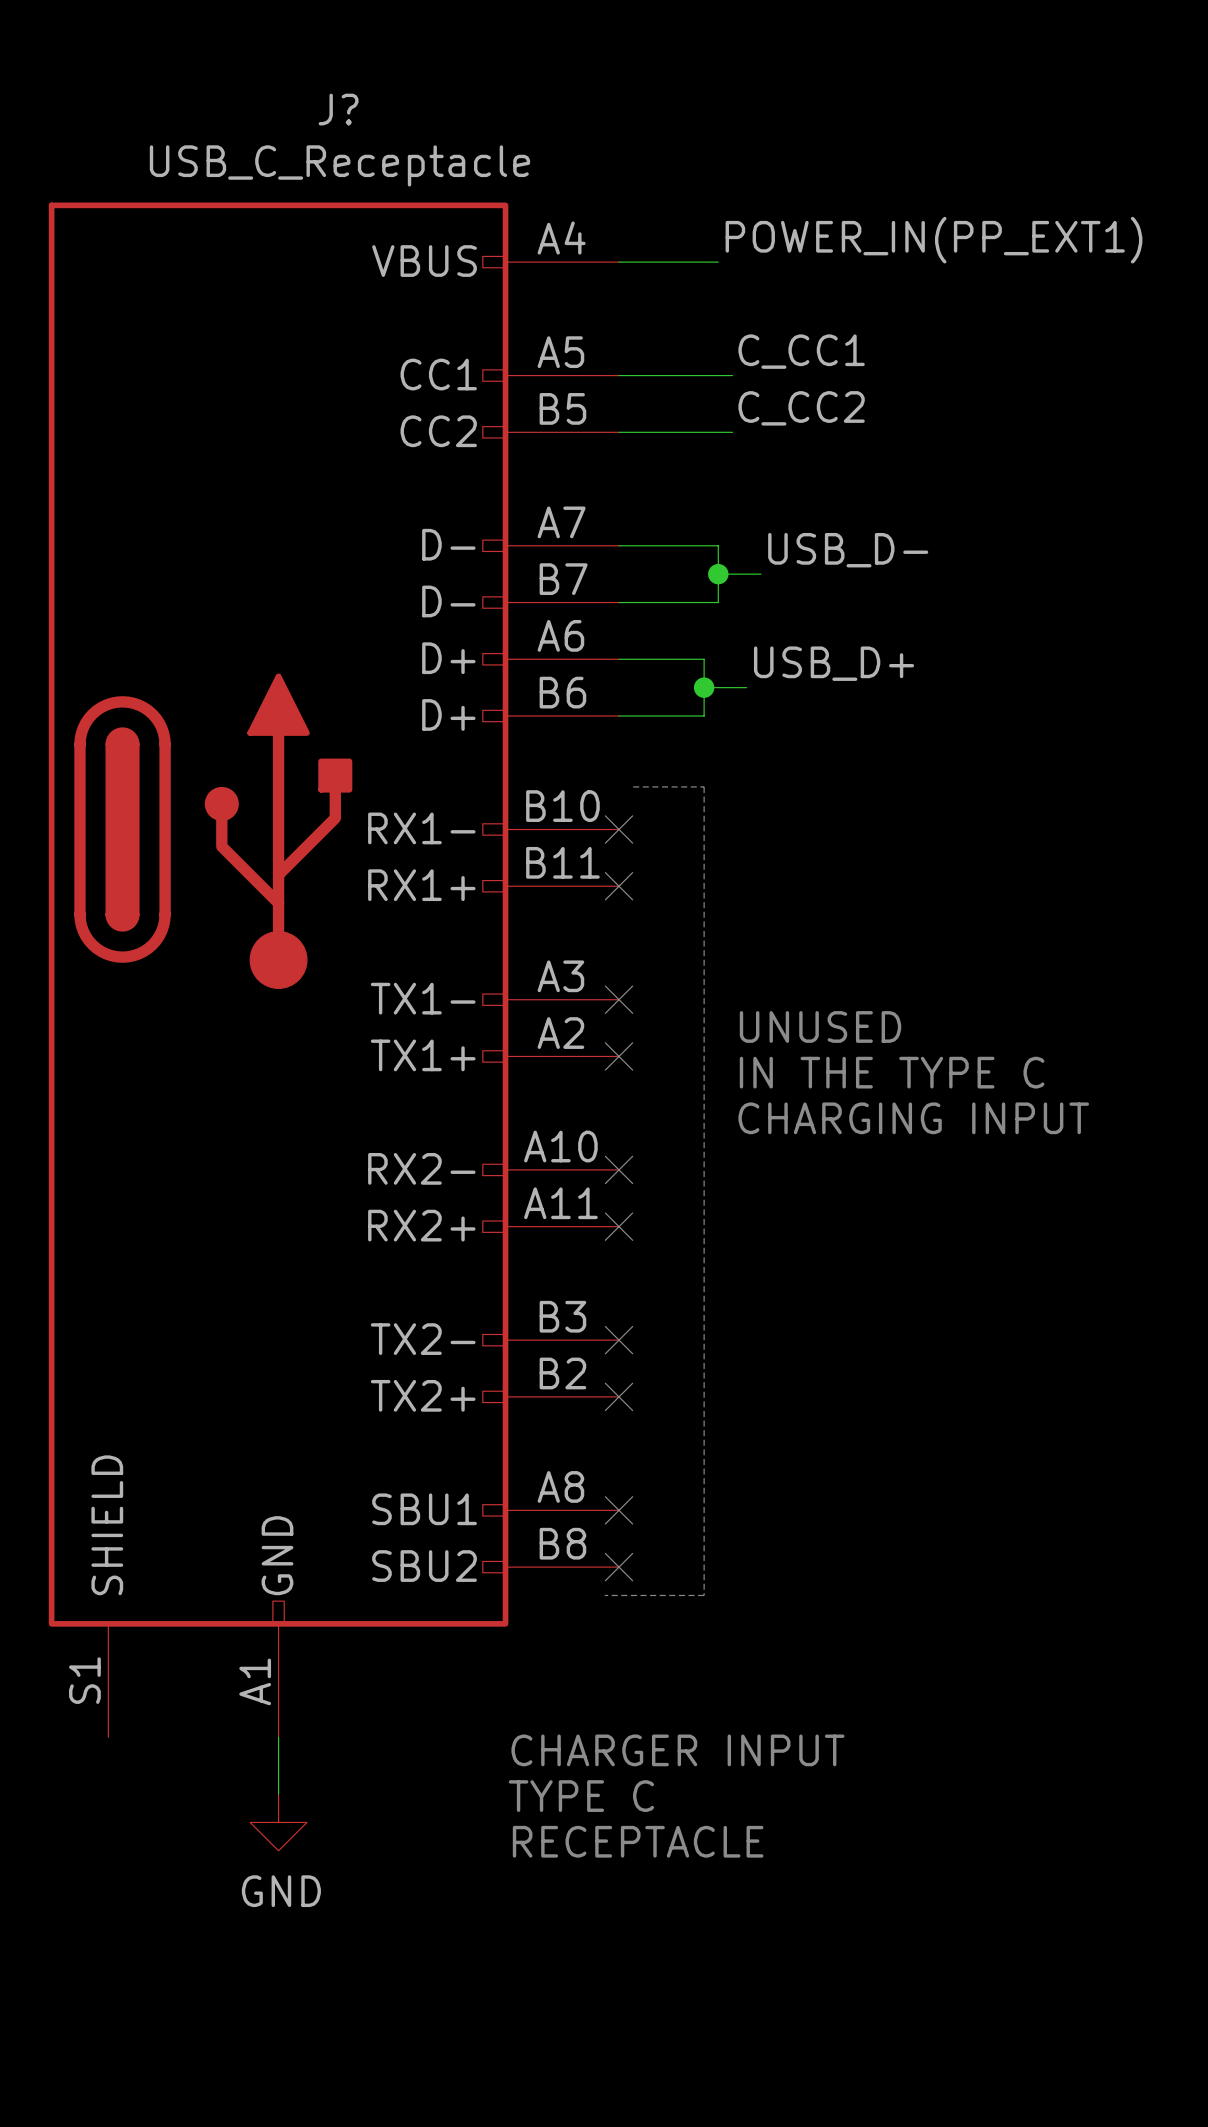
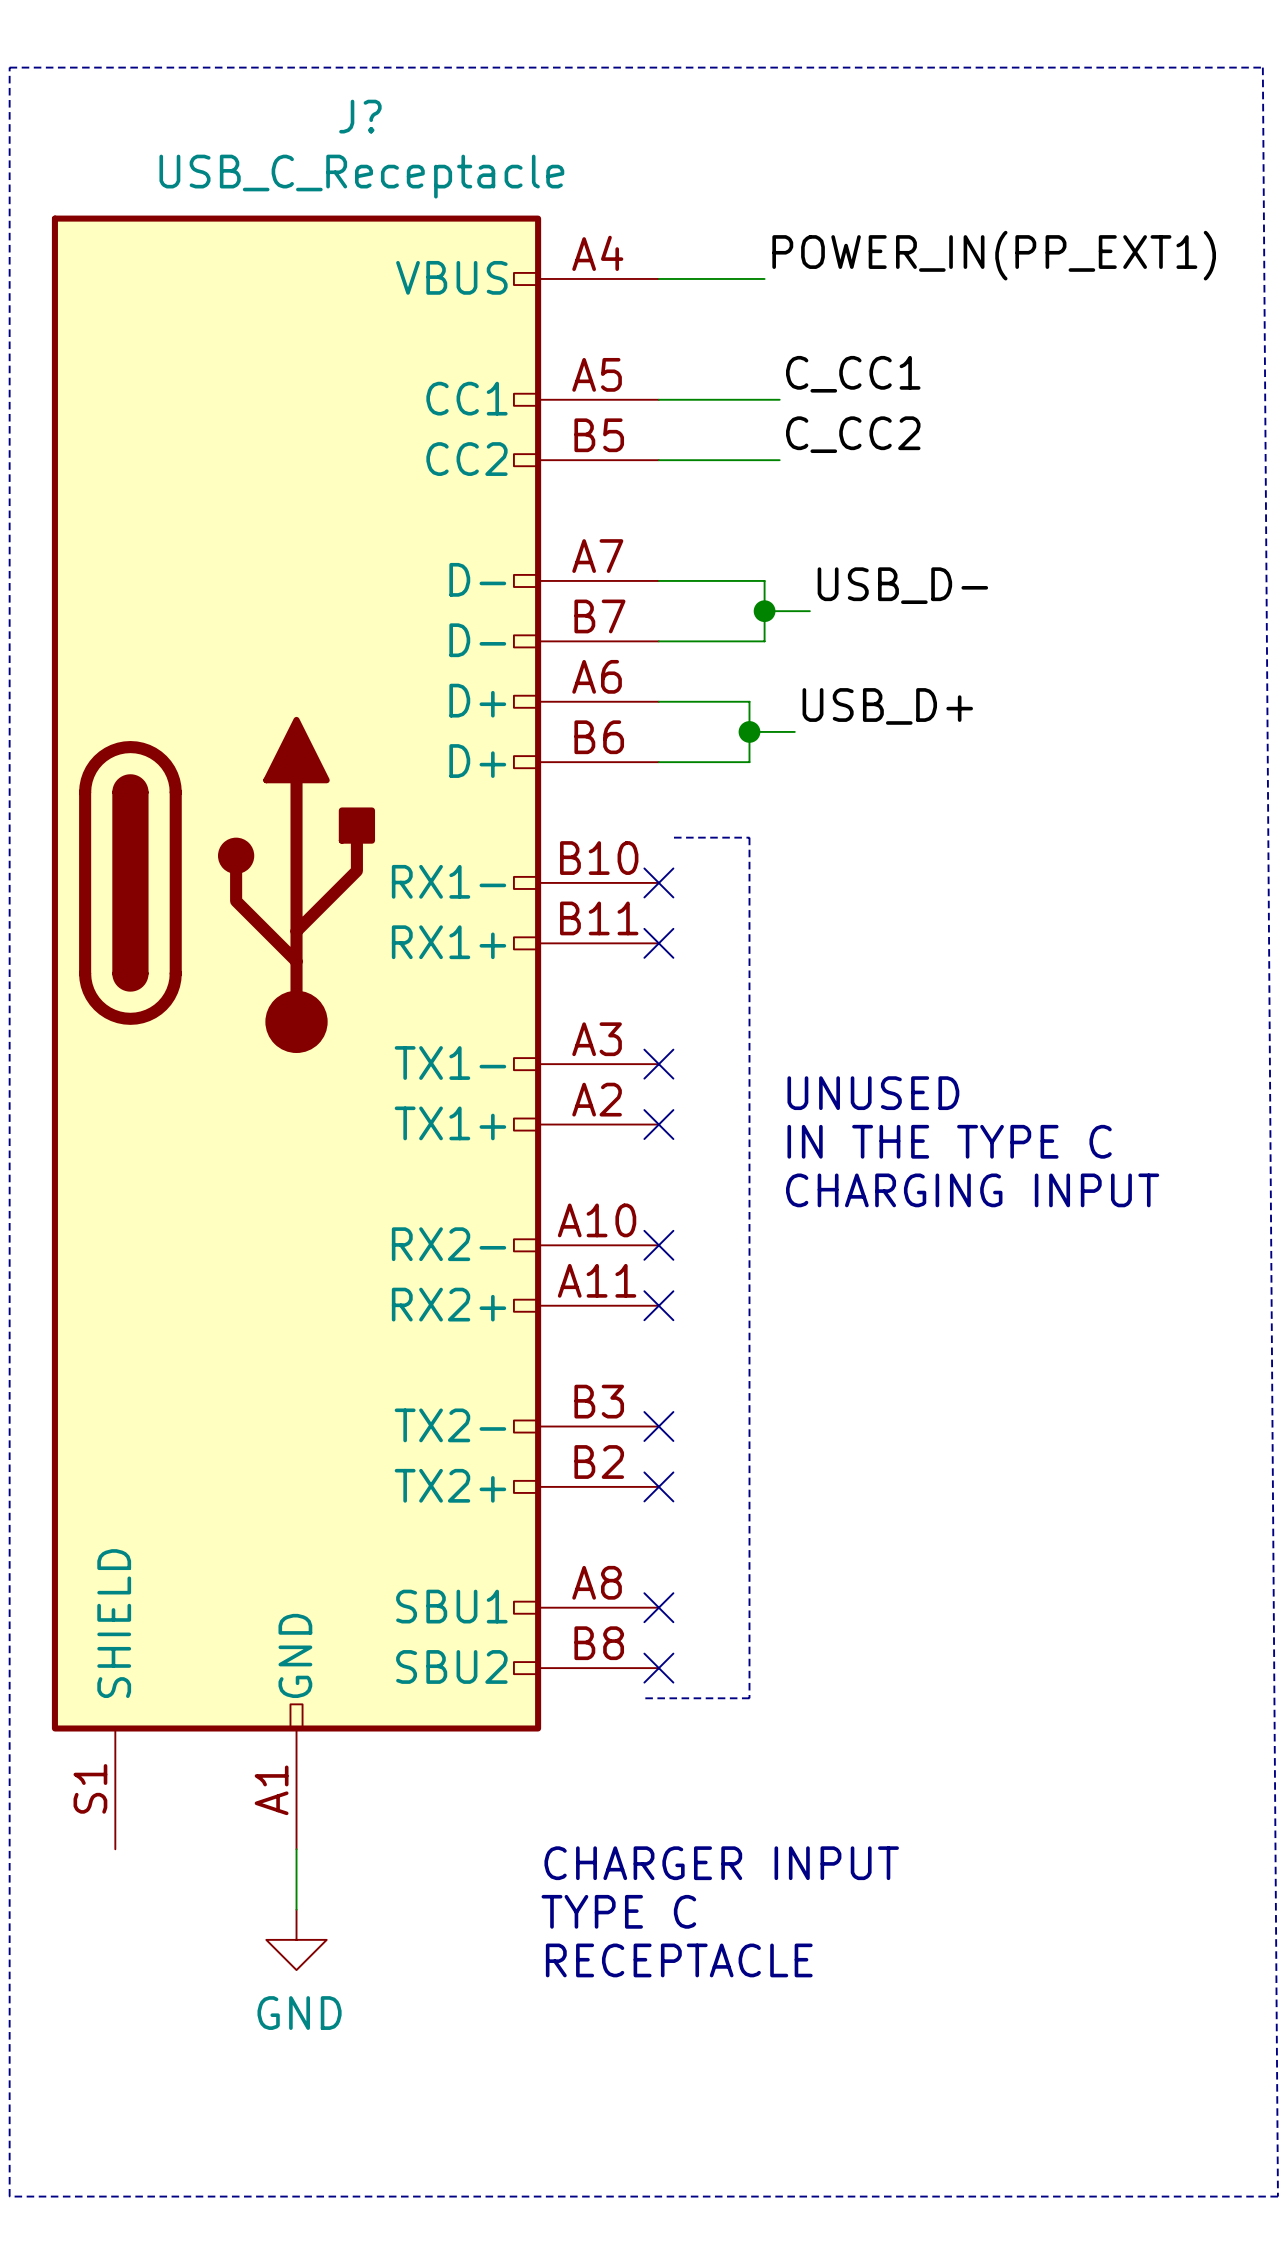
line: none -> (9, 67) (9, 2196) (1277, 2196) (1262, 67) (9, 67)

